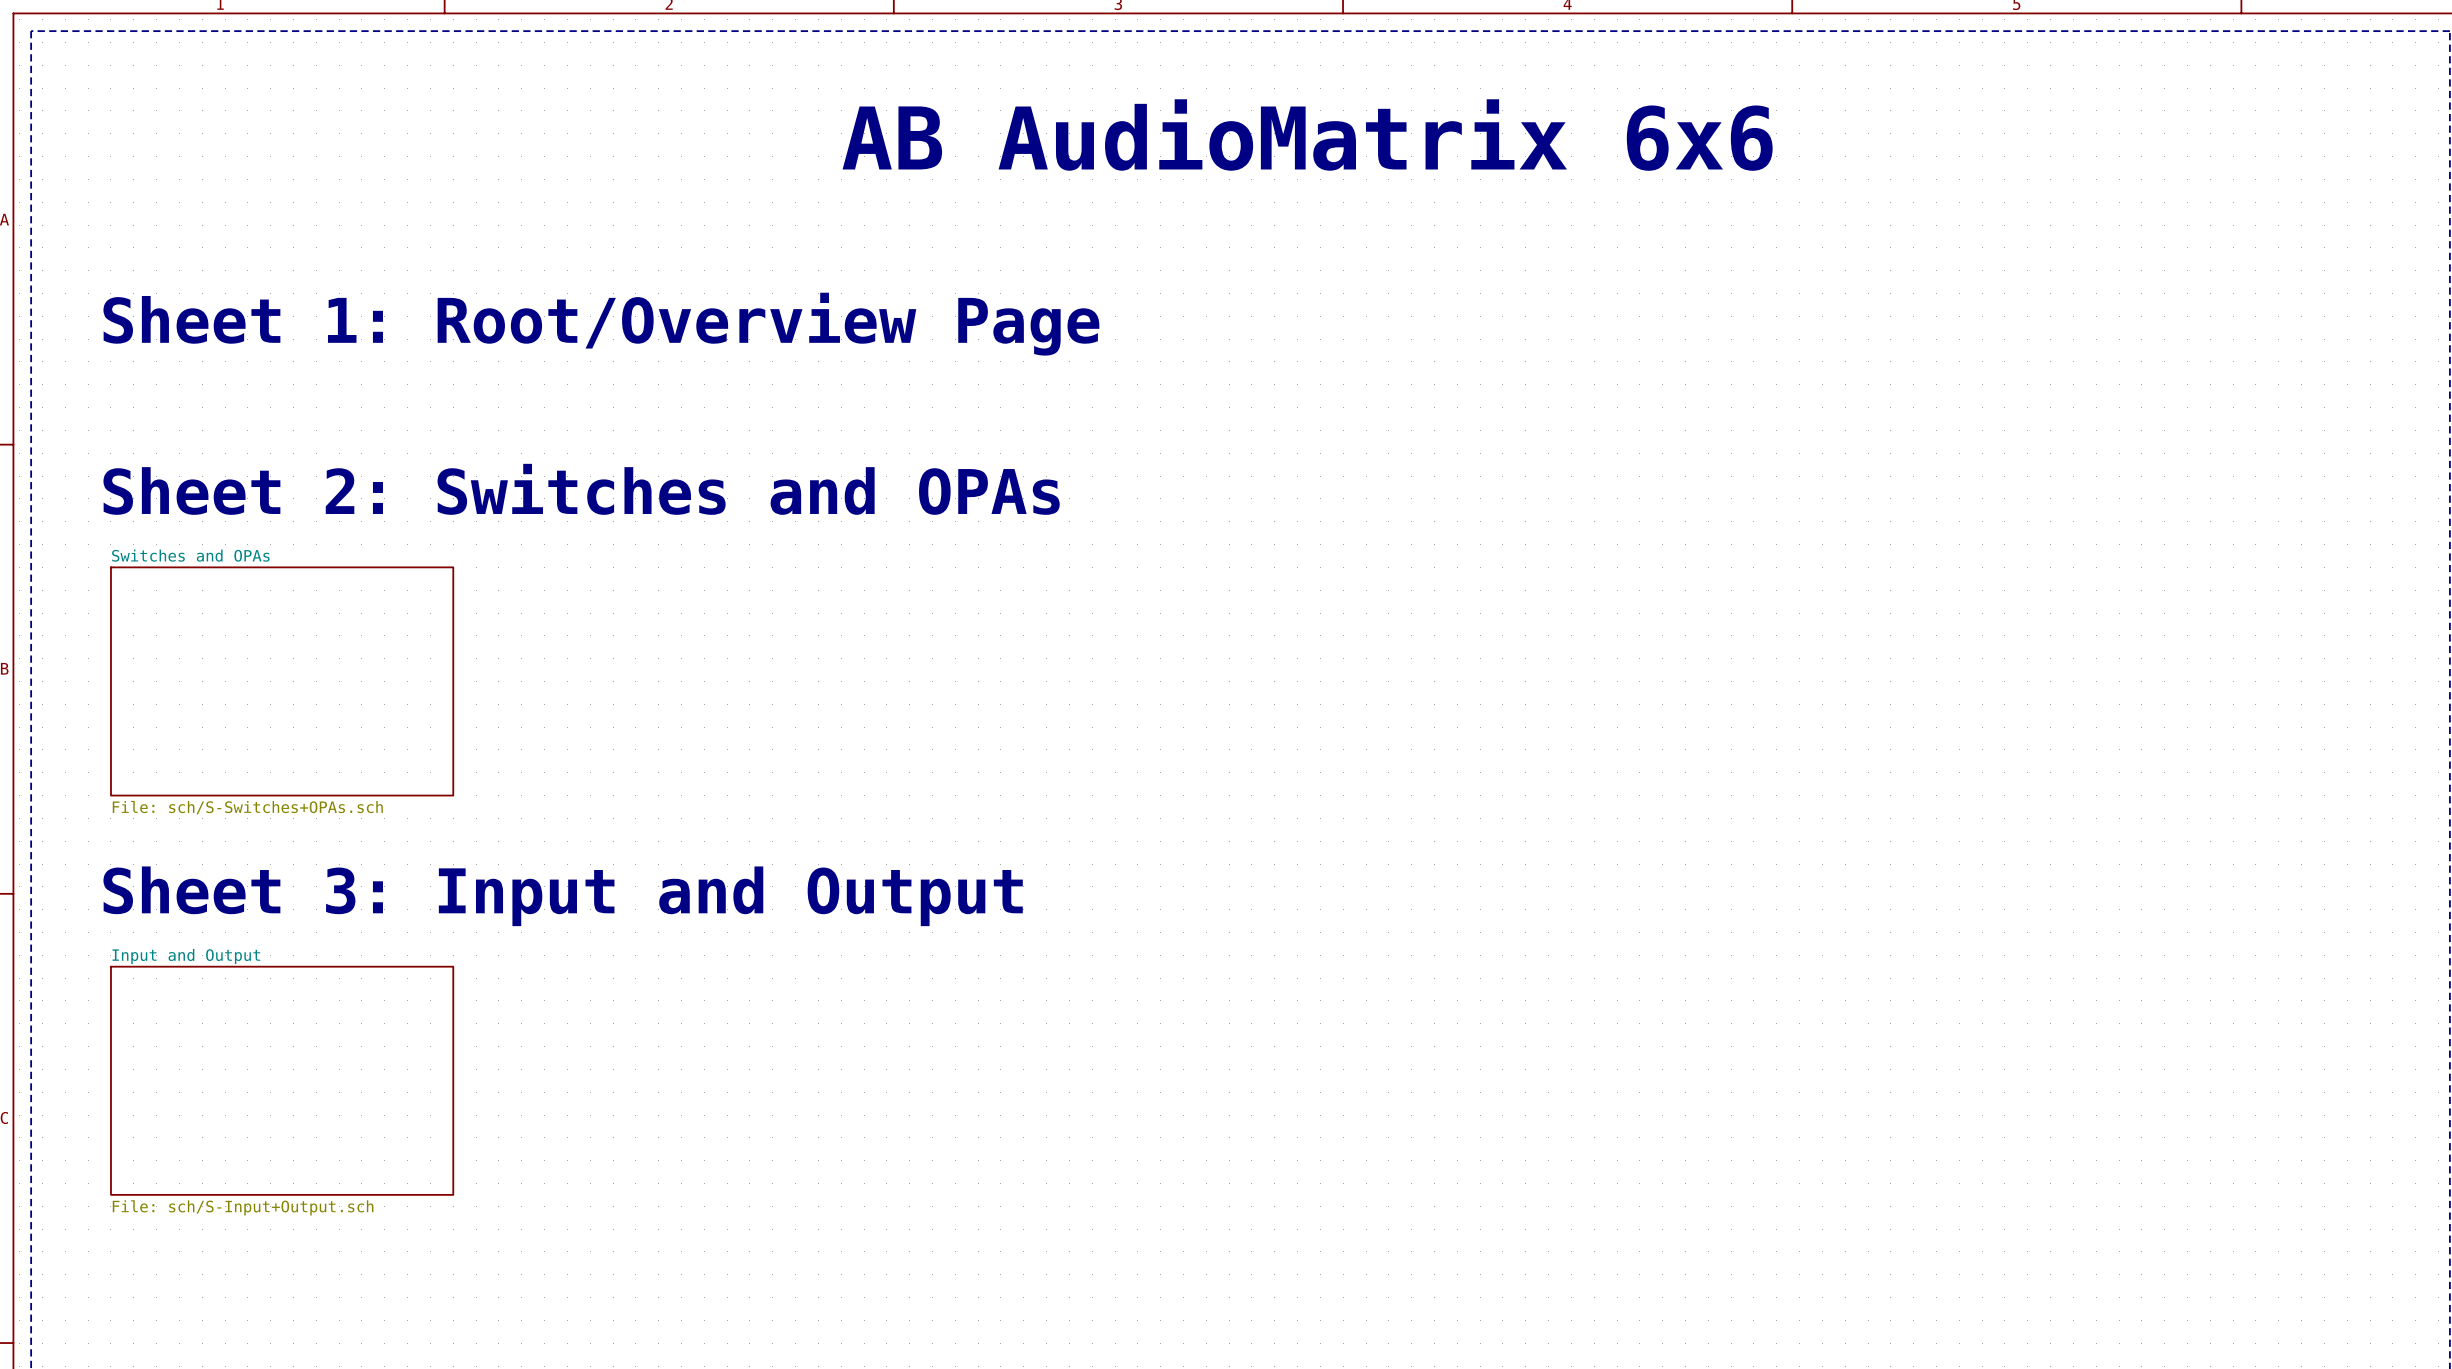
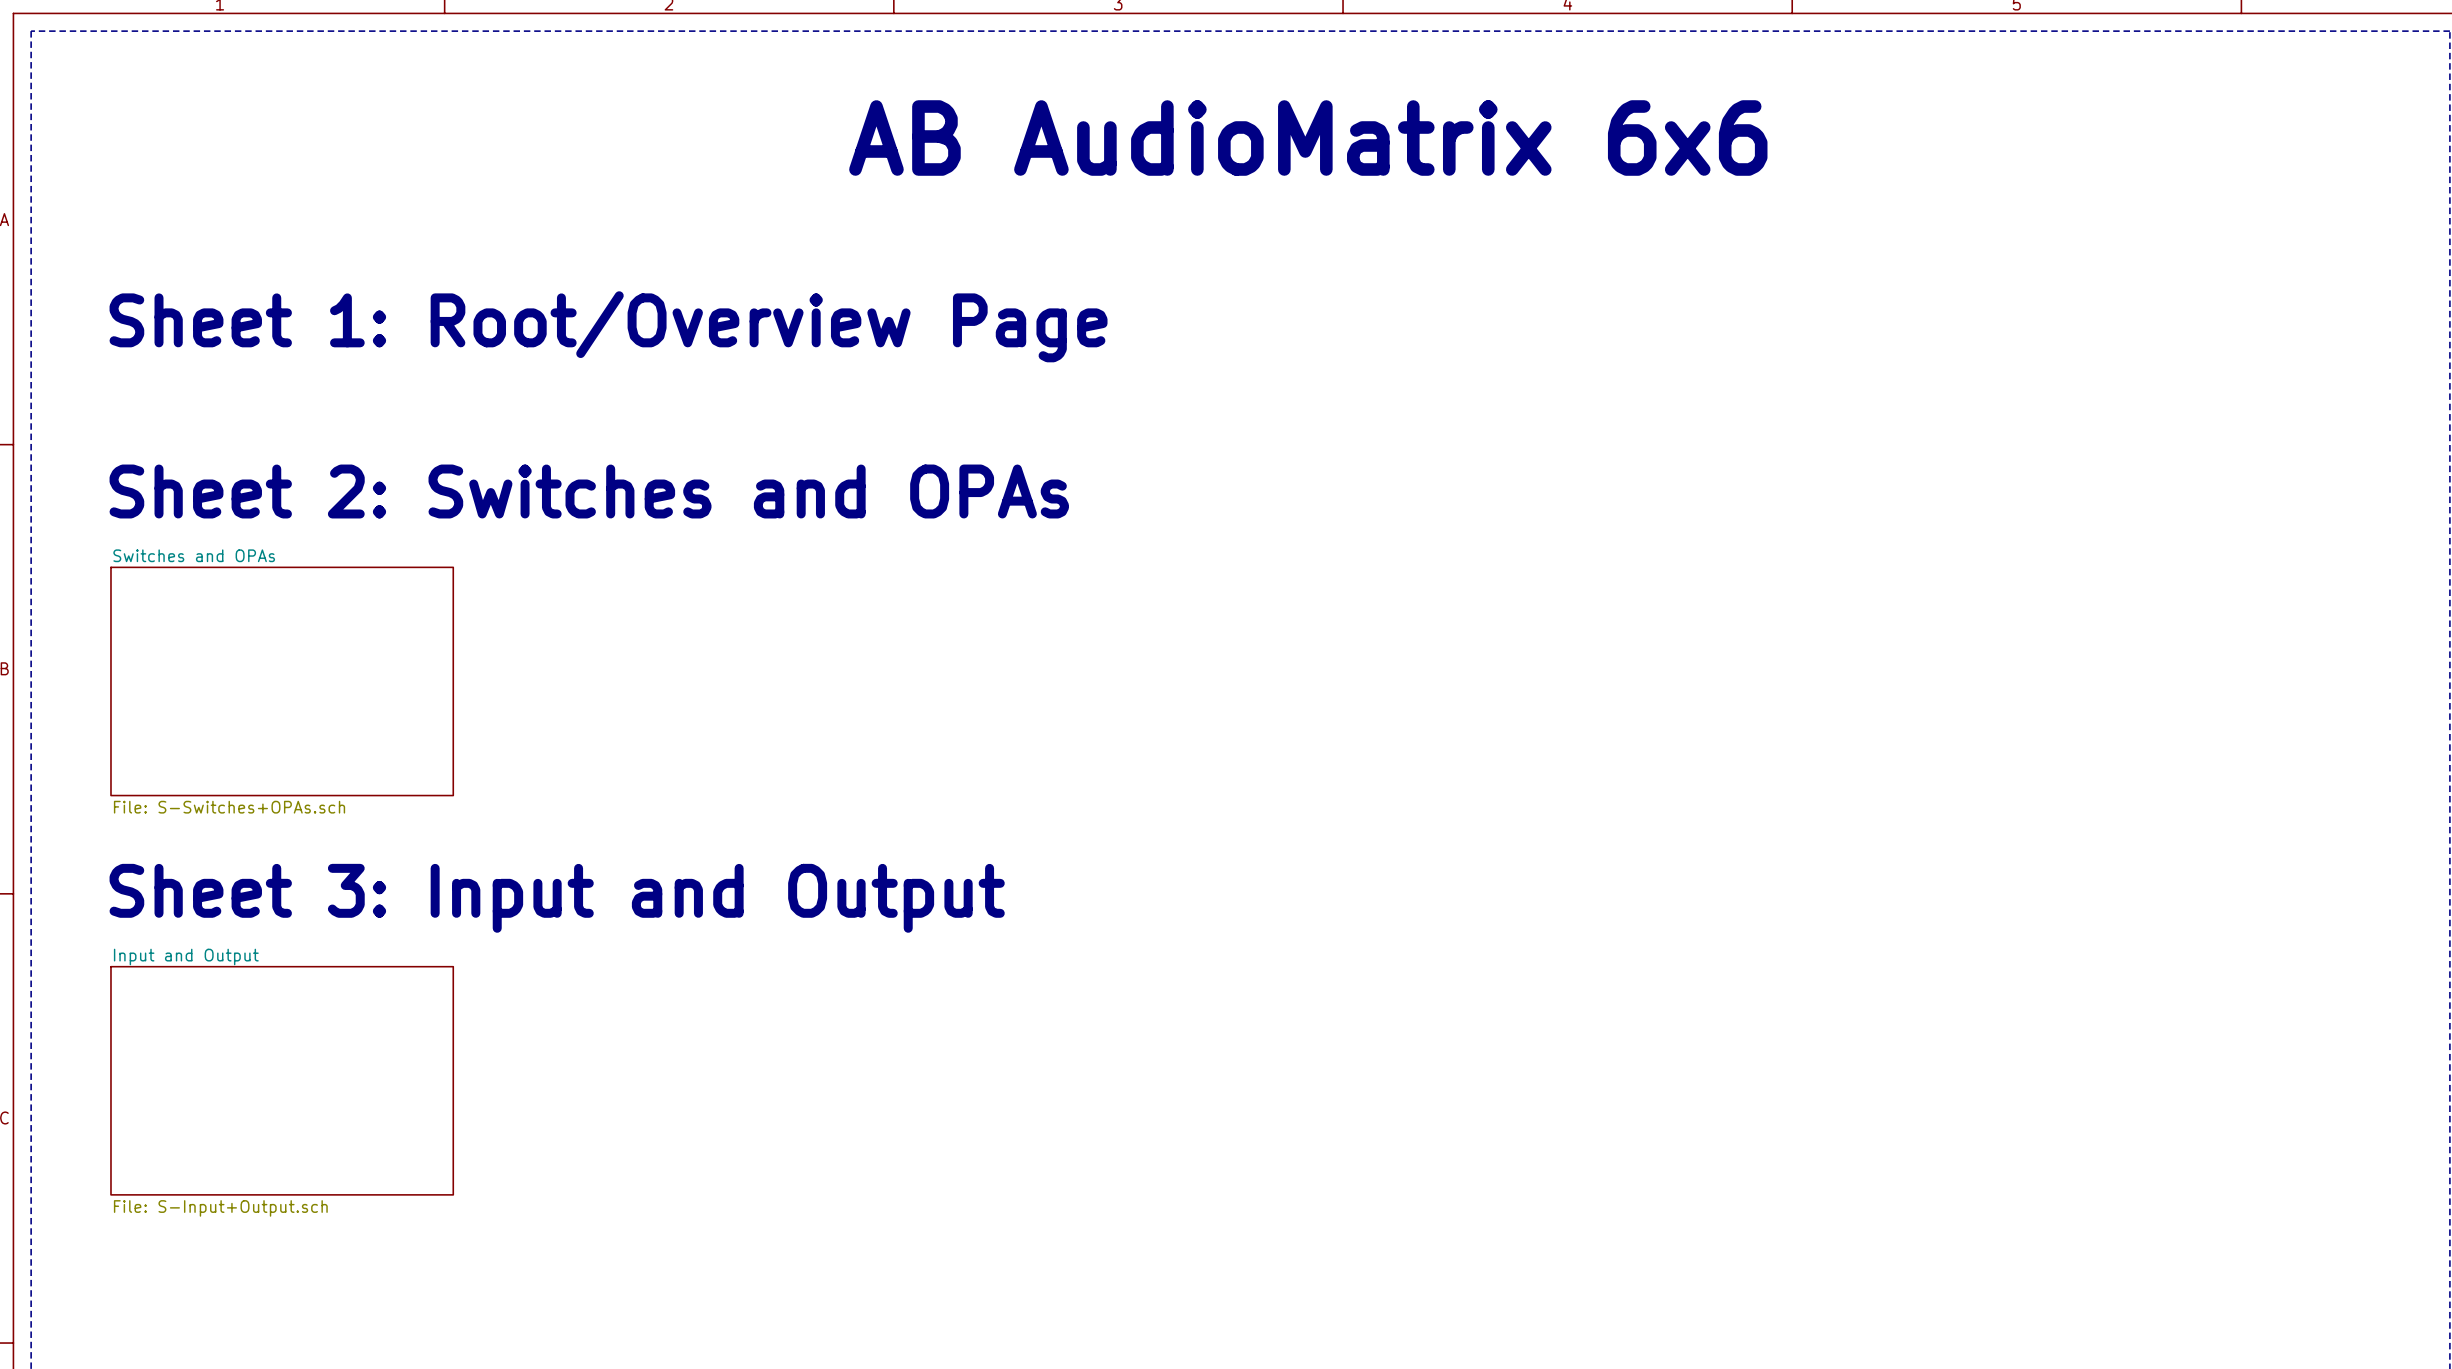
sheet Switches and OPAs value: File: sch/S-Switches+OPAs.sch (247, 807) -> File: S-Switches+OPAs.sch (229, 807)
sheet Input and Output value: File: sch/S-Input+Output.sch (243, 1207) -> File: S-Input+Output.sch (220, 1208)

